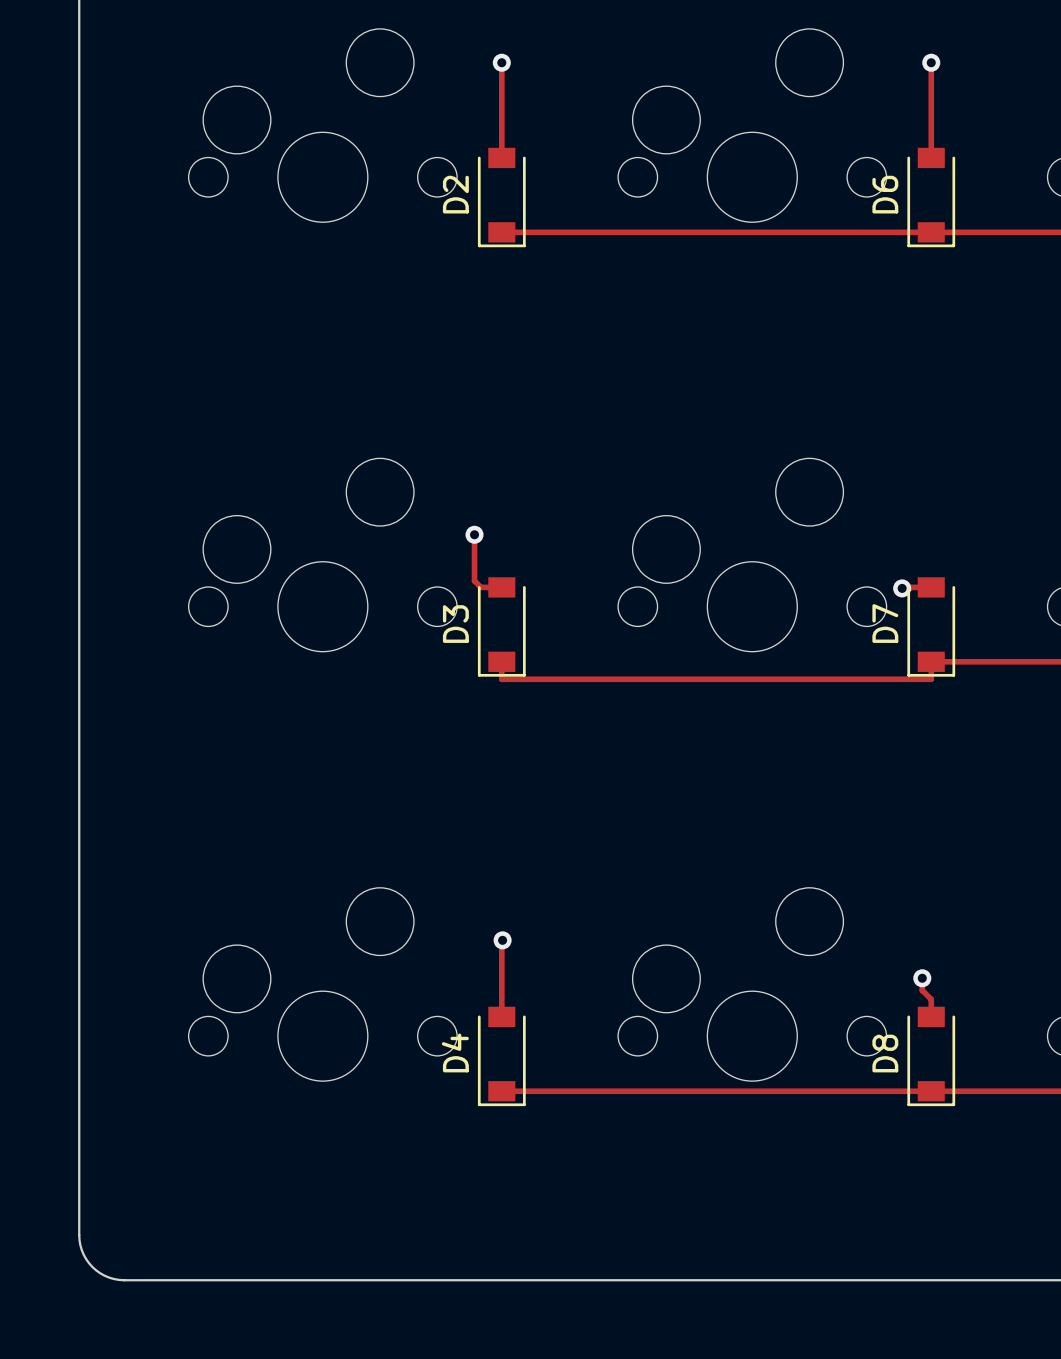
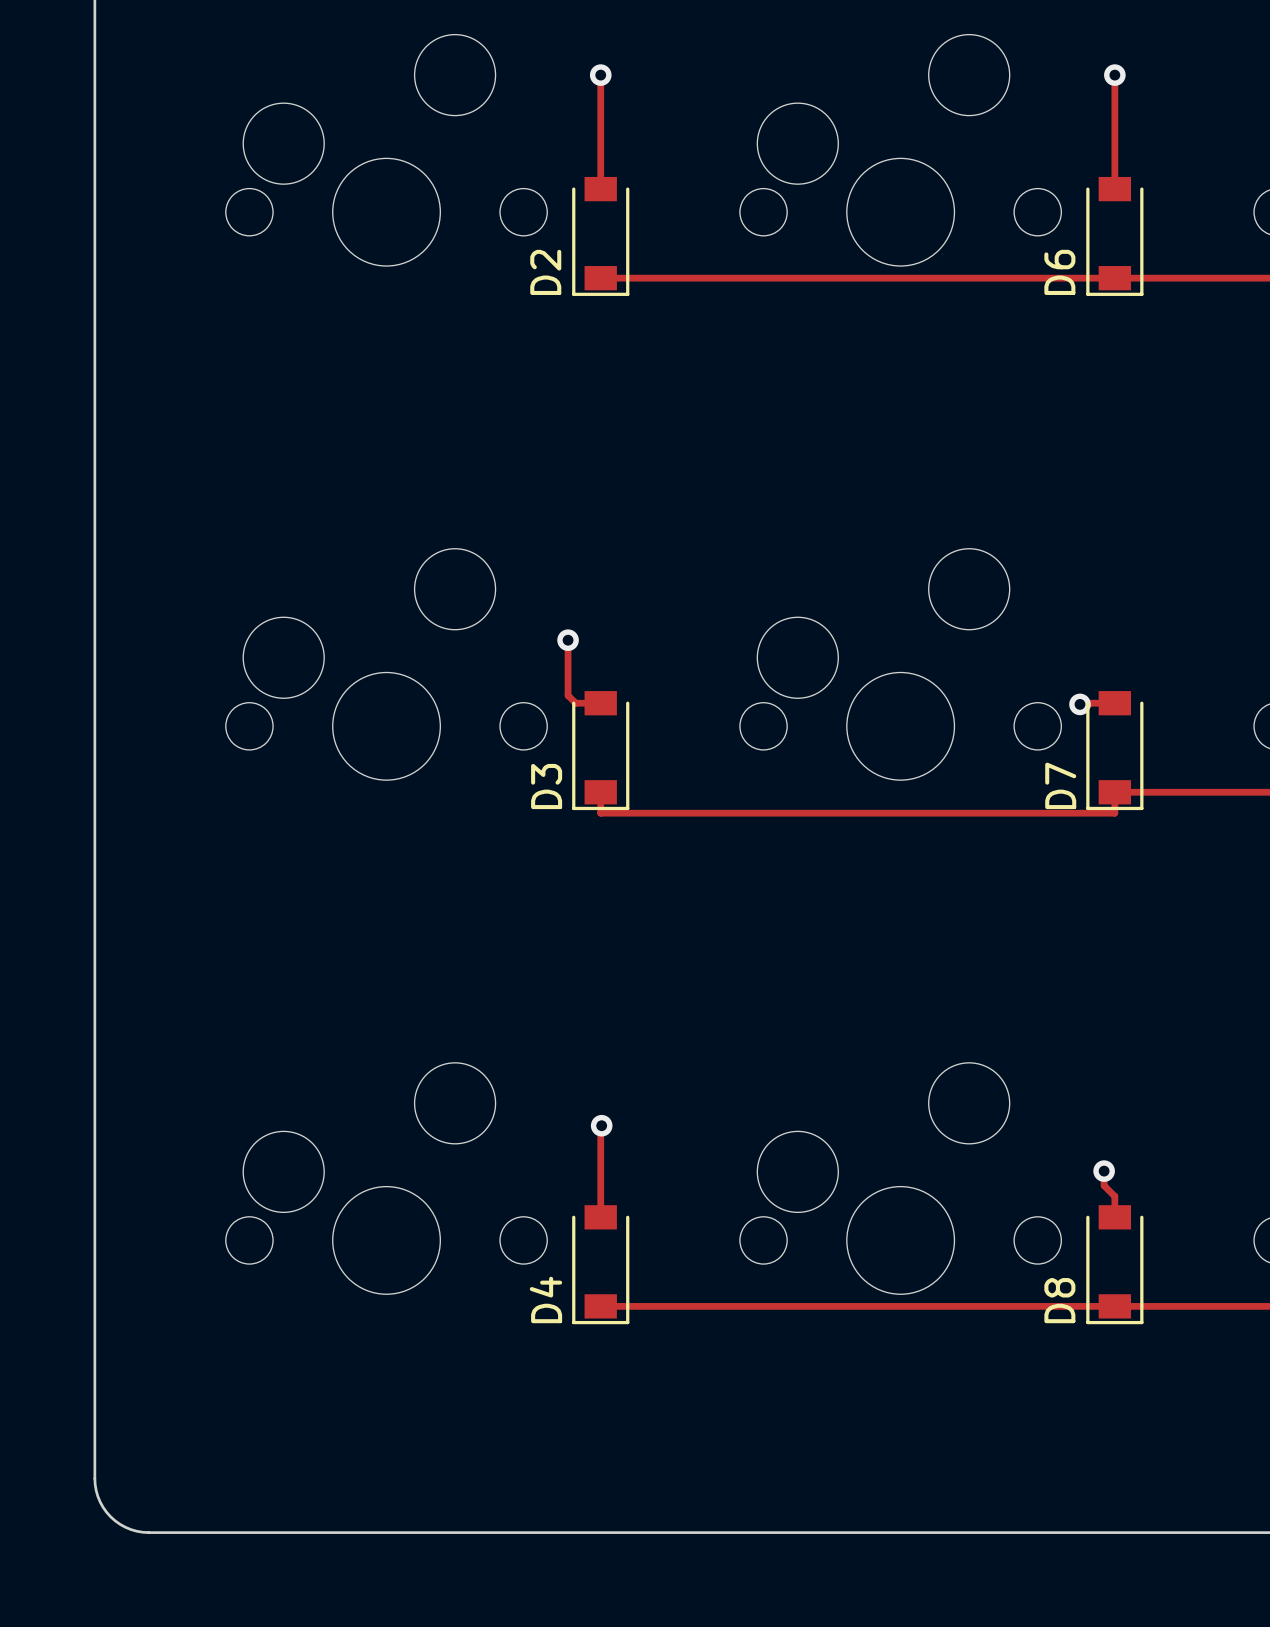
D2 name position: D2 (455, 194) -> D2 (545, 272)
D6 name position: D6 (885, 194) -> D6 (1059, 272)
D7 name position: D7 (885, 623) -> D7 (1060, 785)
D3 name position: D3 (455, 624) -> D3 (546, 786)
D4 name position: D4 (455, 1052) -> D4 (545, 1299)
D8 name position: D8 (885, 1053) -> D8 (1059, 1300)

